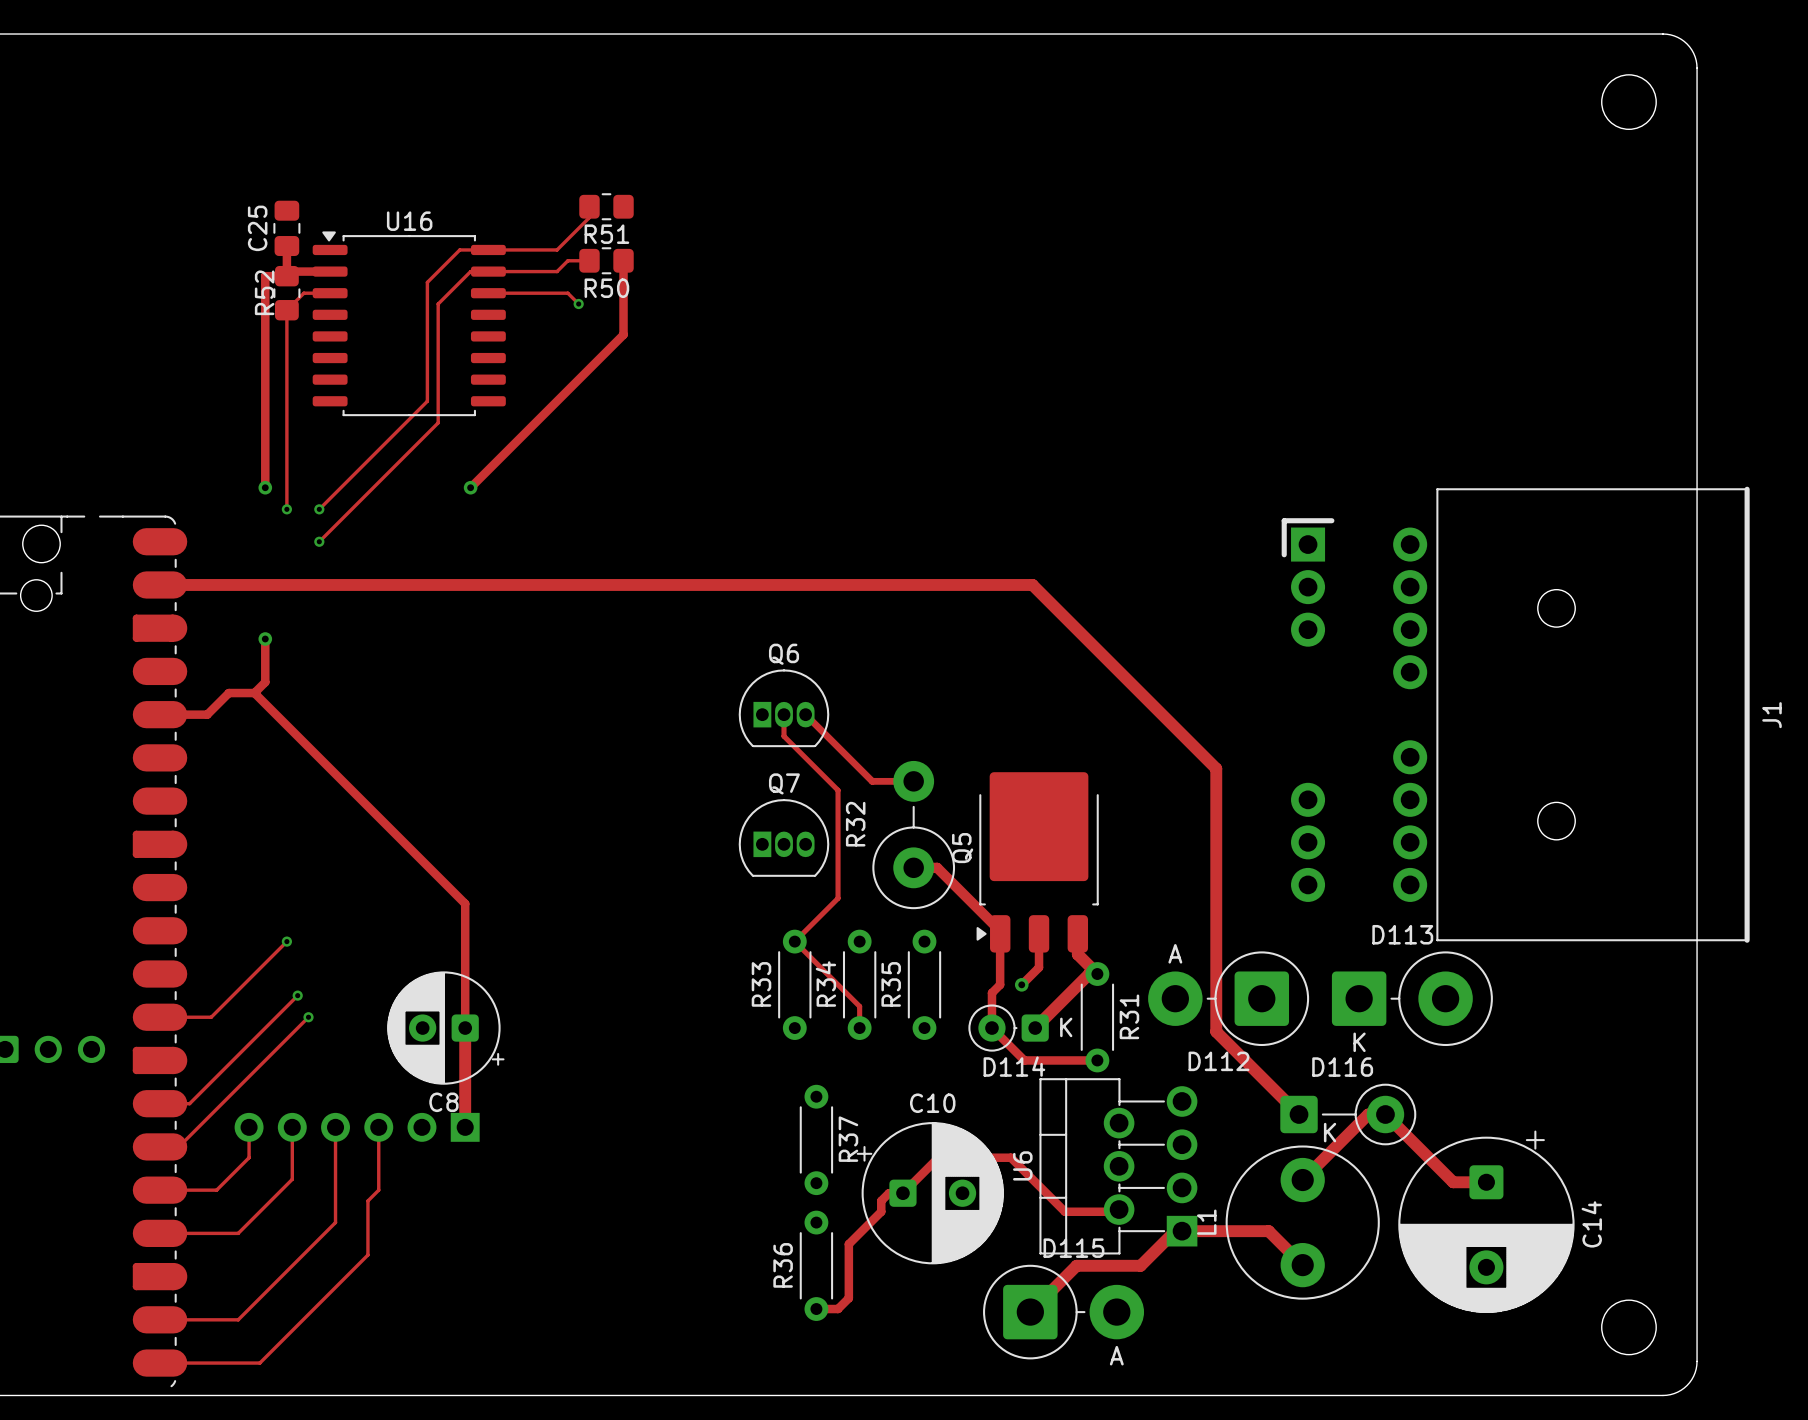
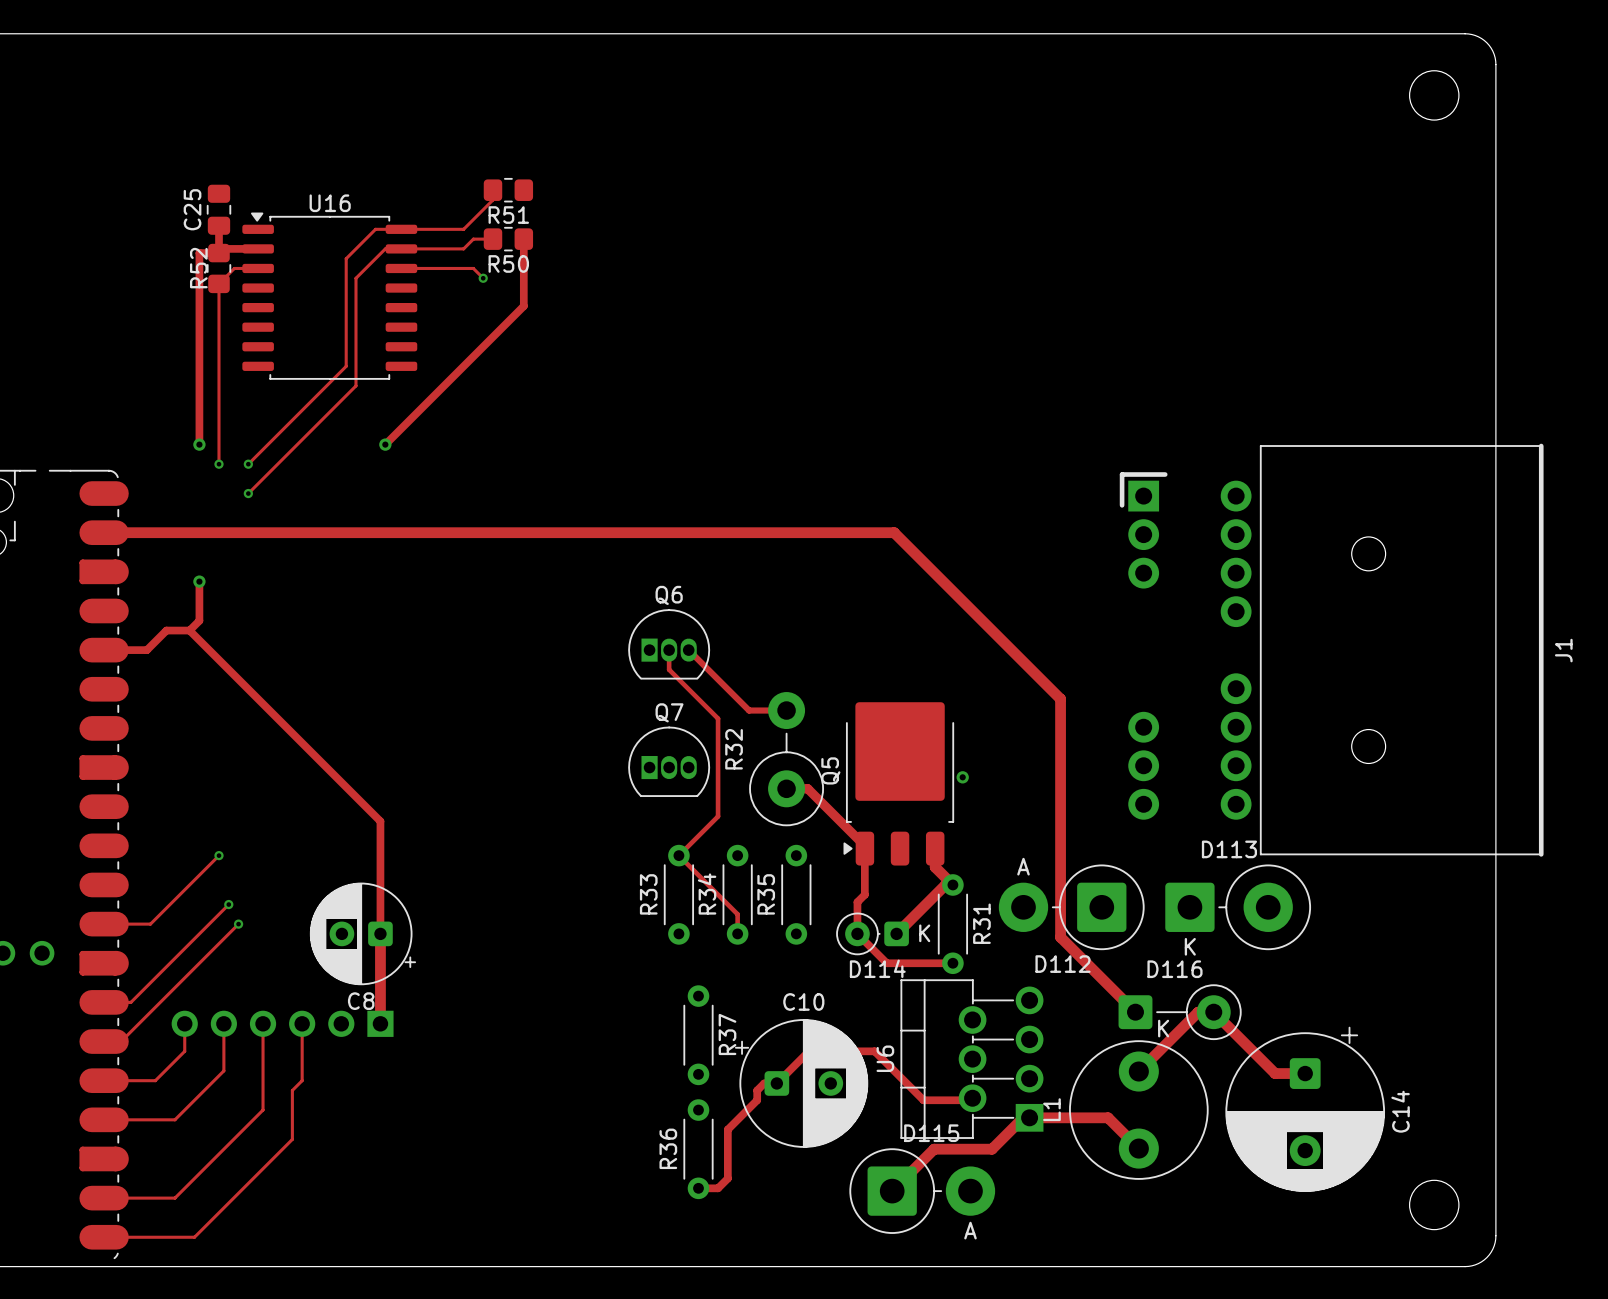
via: none -> (962, 777)
track: (1039, 933) (1039, 967) (1021, 984) -> none
via: (1021, 984) -> none

